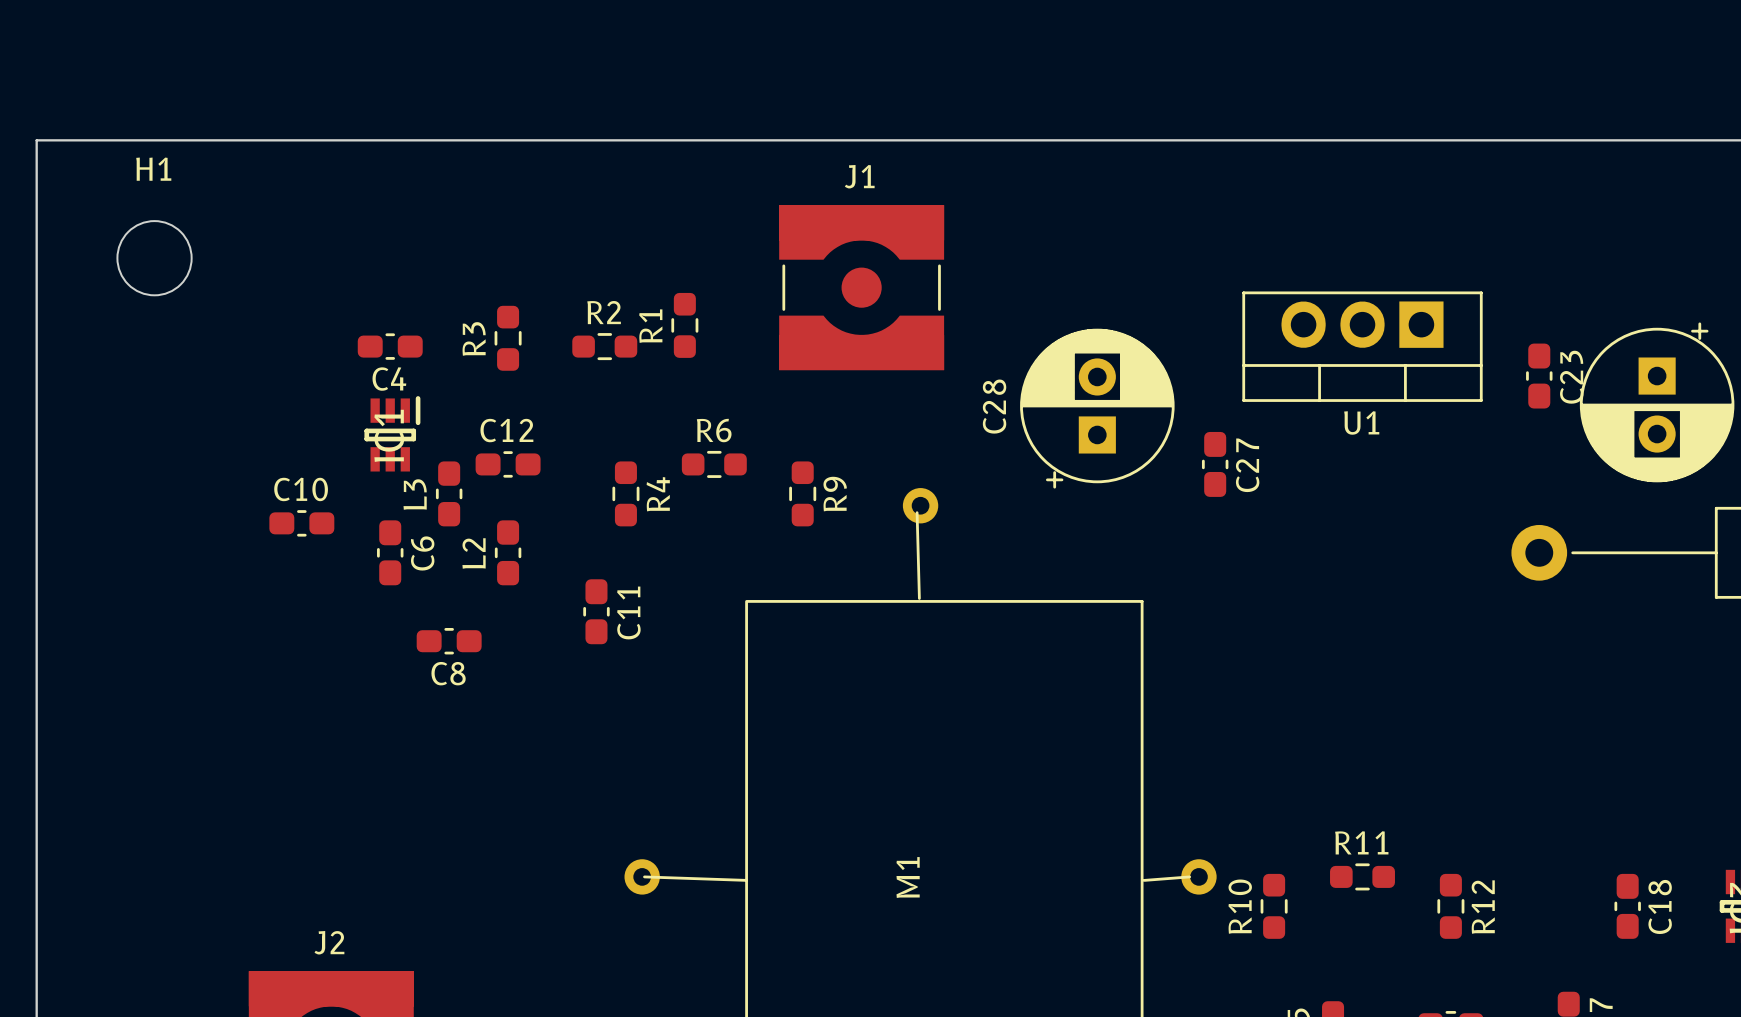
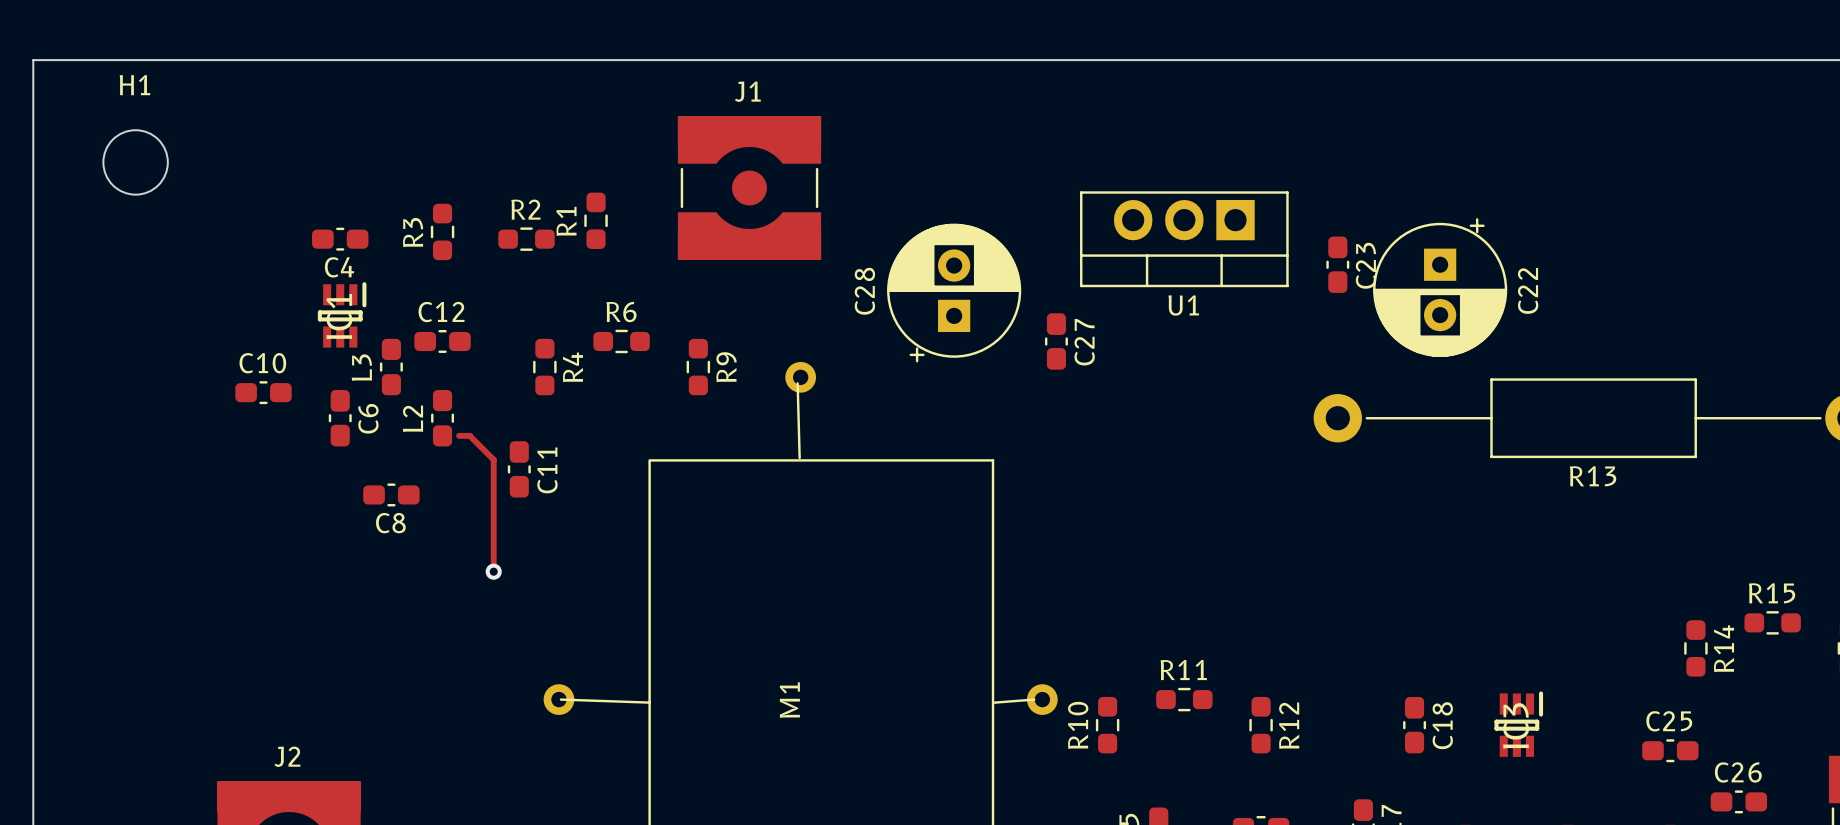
top track: none -> (459, 435) (469, 435) (493, 459) (493, 571)
via: none -> (493, 571)

